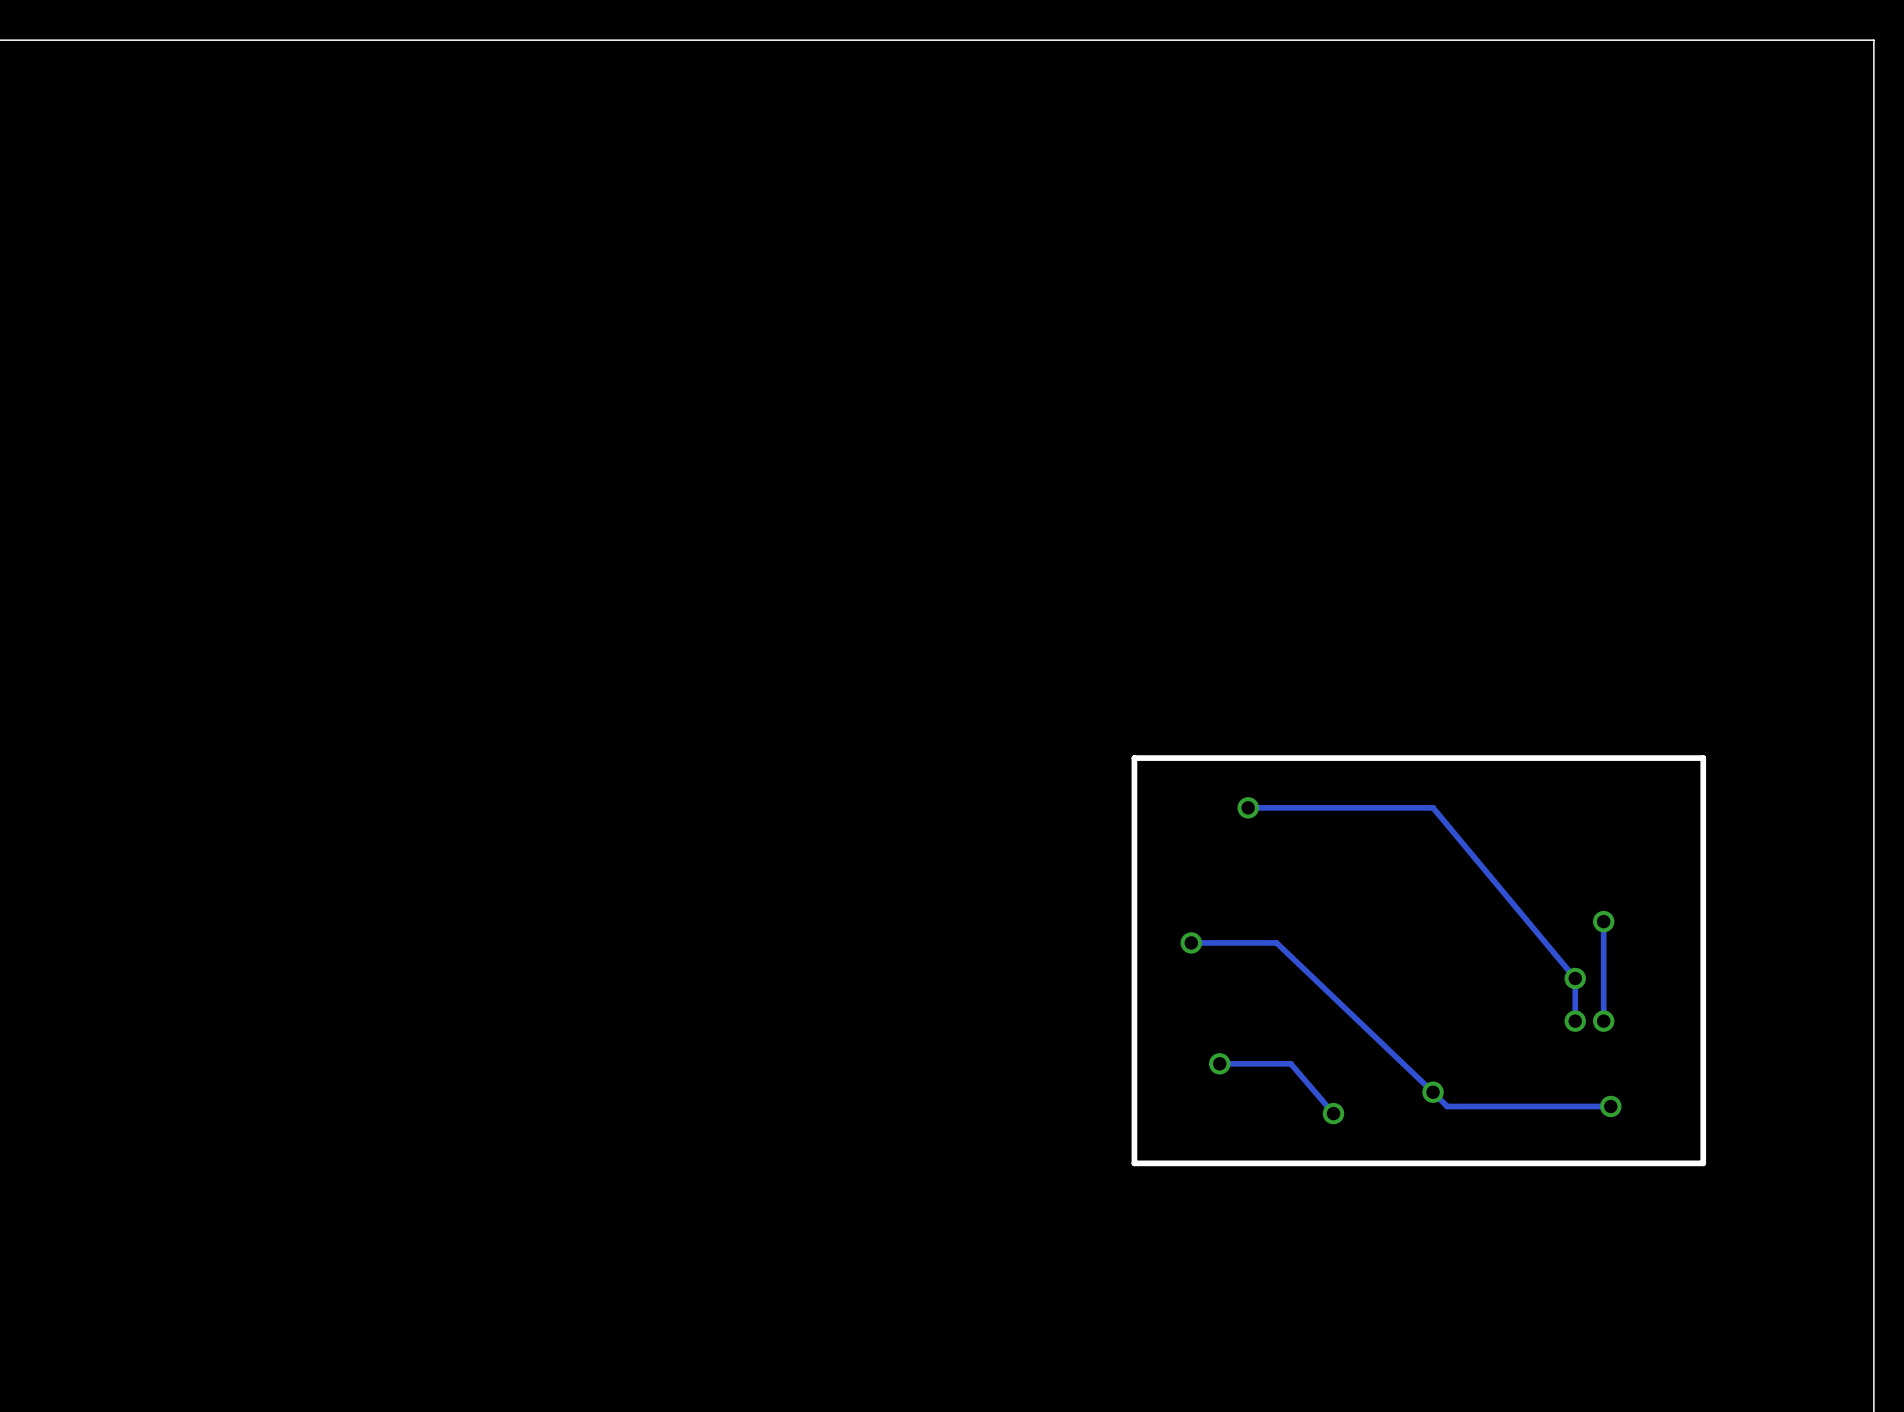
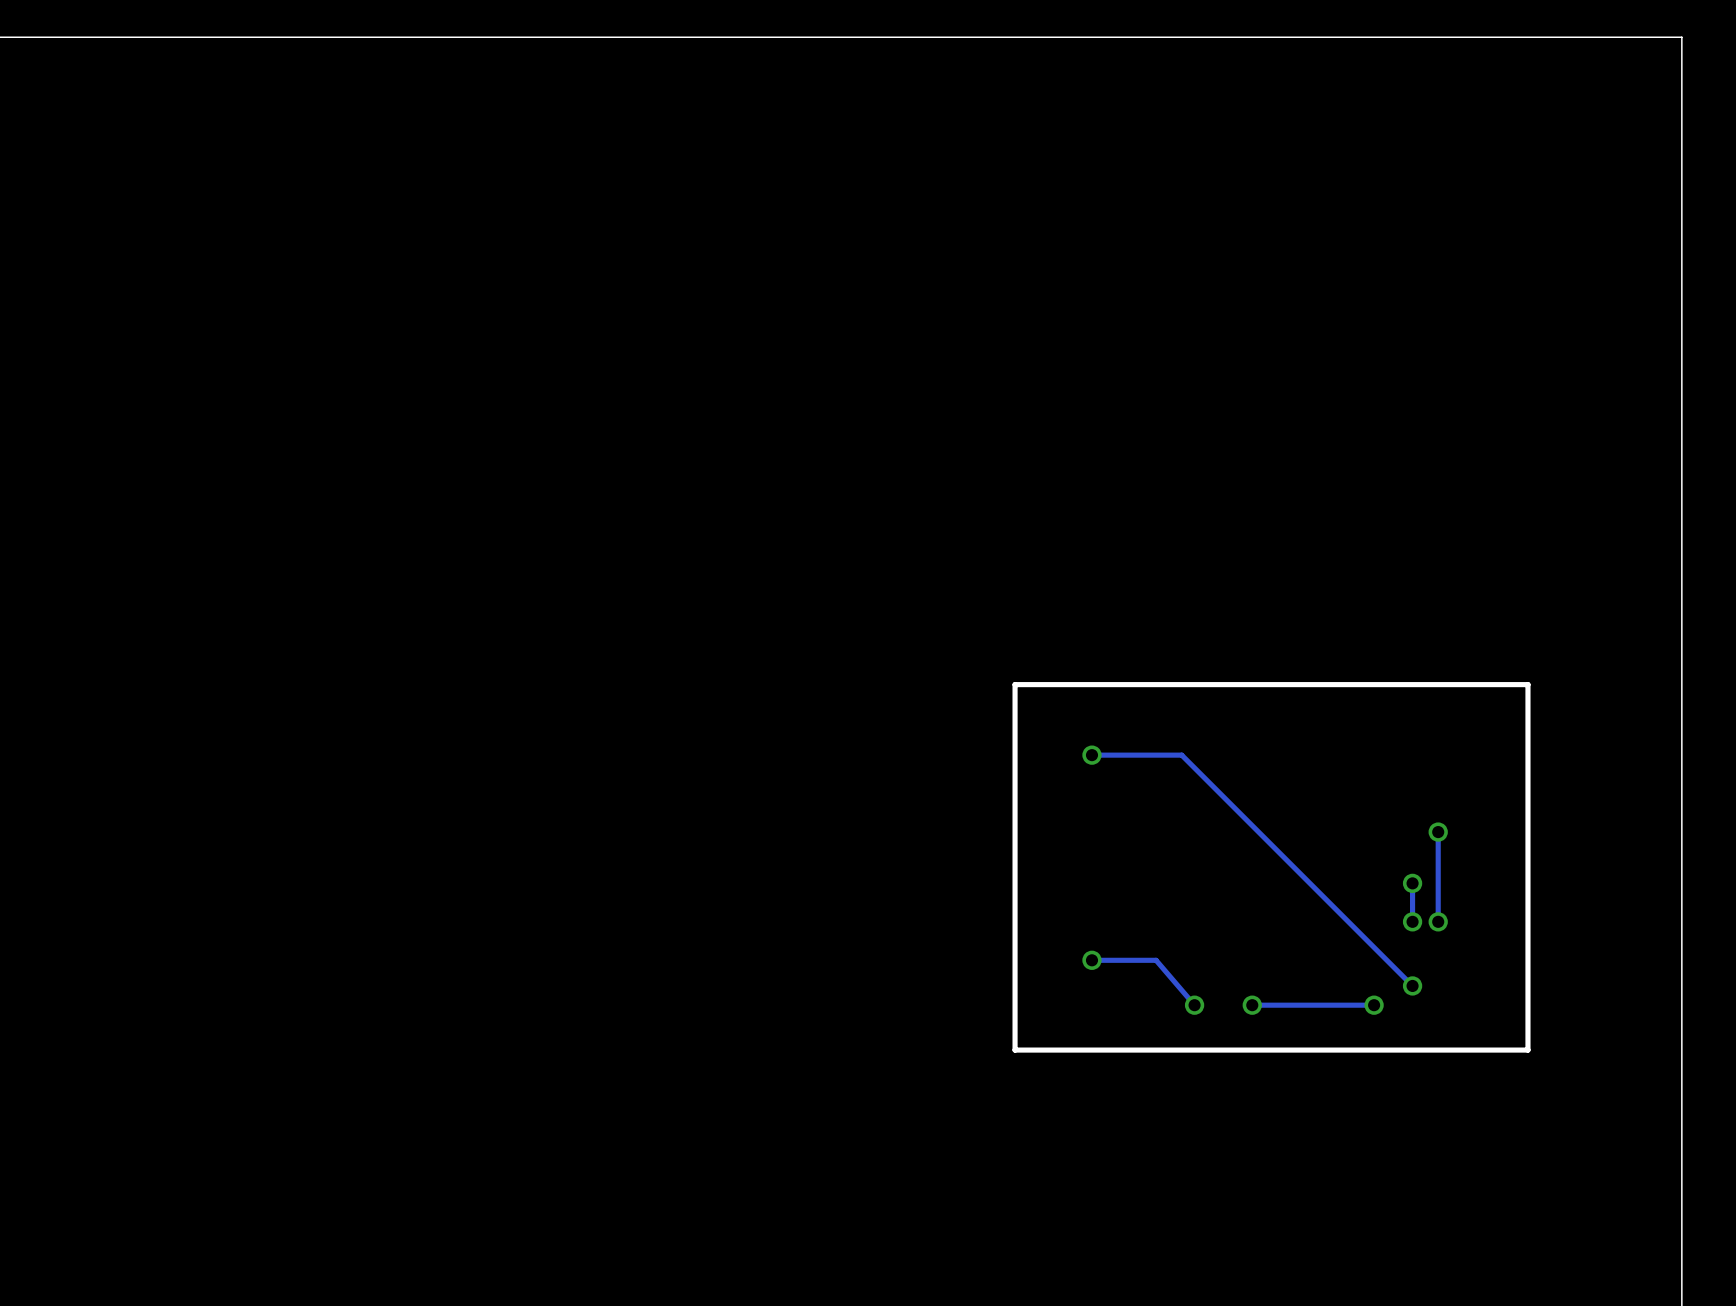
track: (1248, 807) (1433, 807) (1575, 978) -> none
via position: (1248, 807) -> (1091, 755)
track: none -> (1091, 755) (1181, 755) (1412, 985)
track: (1191, 942) (1276, 942) (1447, 1106) (1610, 1106) -> none
via: (1191, 942) -> none
via position: (1433, 1092) -> (1252, 1005)
via position: (1610, 1106) -> (1412, 985)
track: none -> (1374, 1005) (1252, 1005)
via: none -> (1374, 1005)

